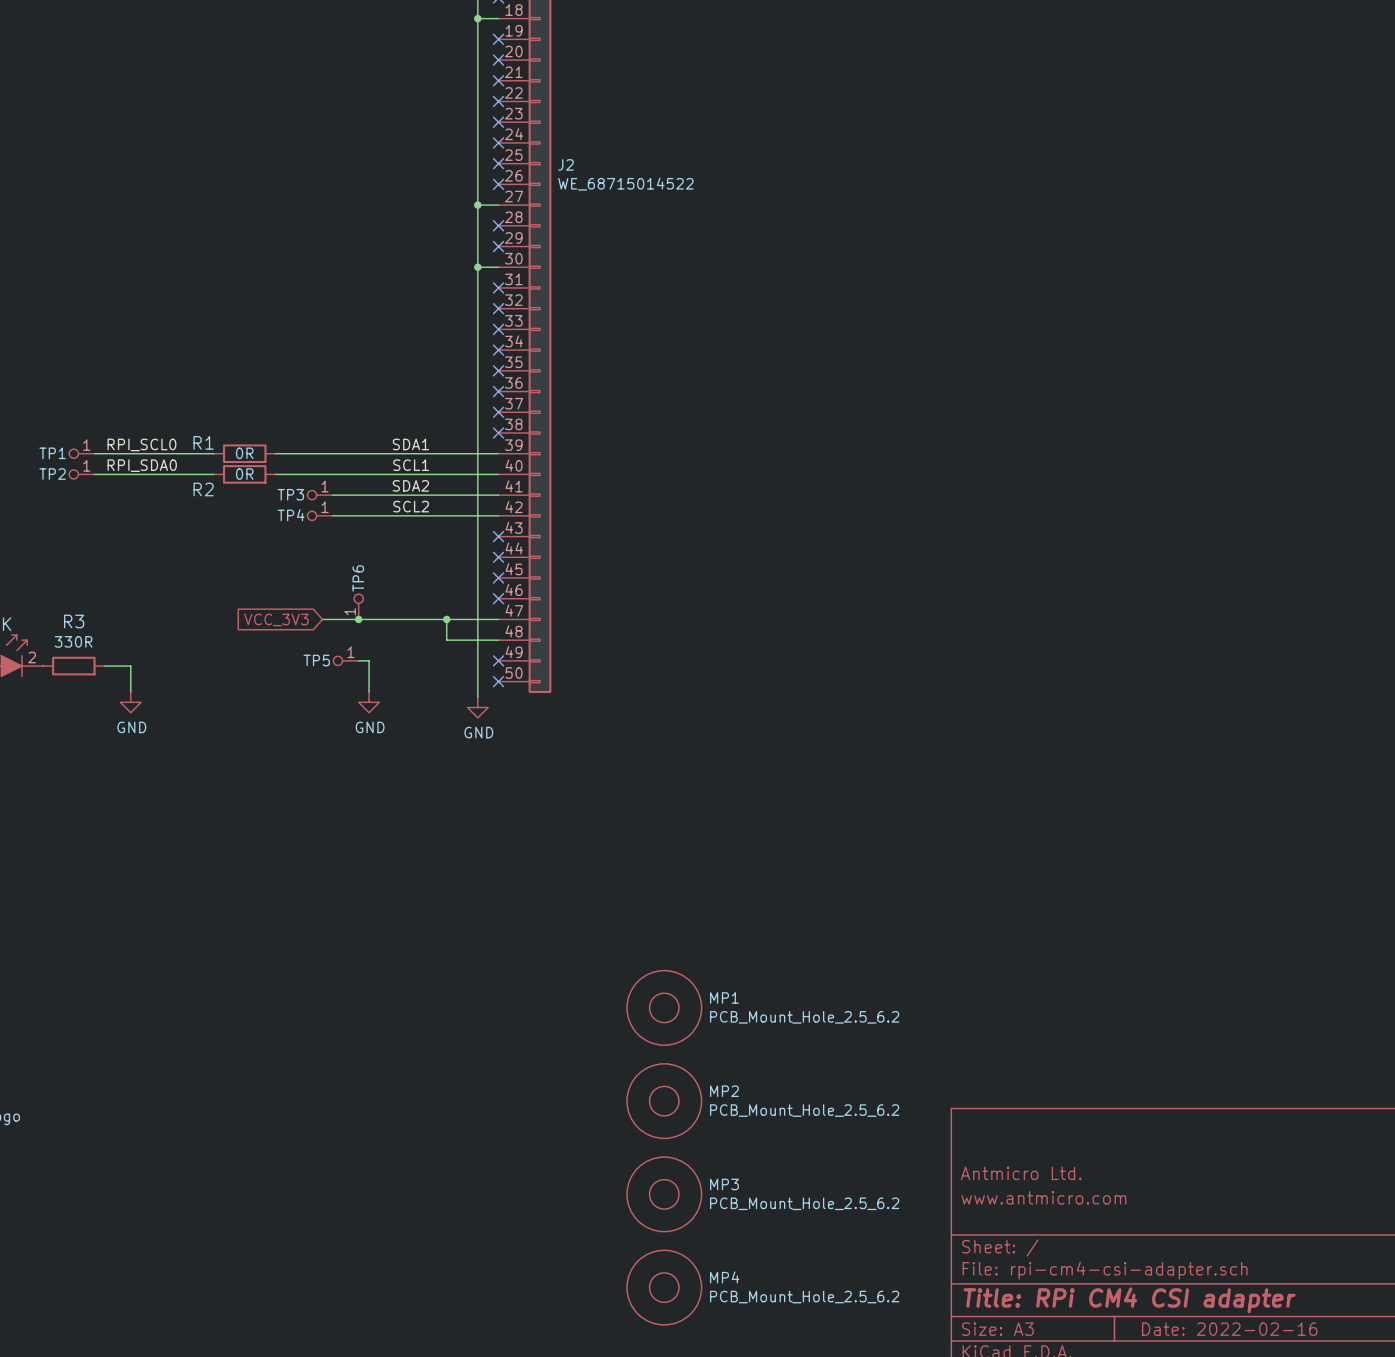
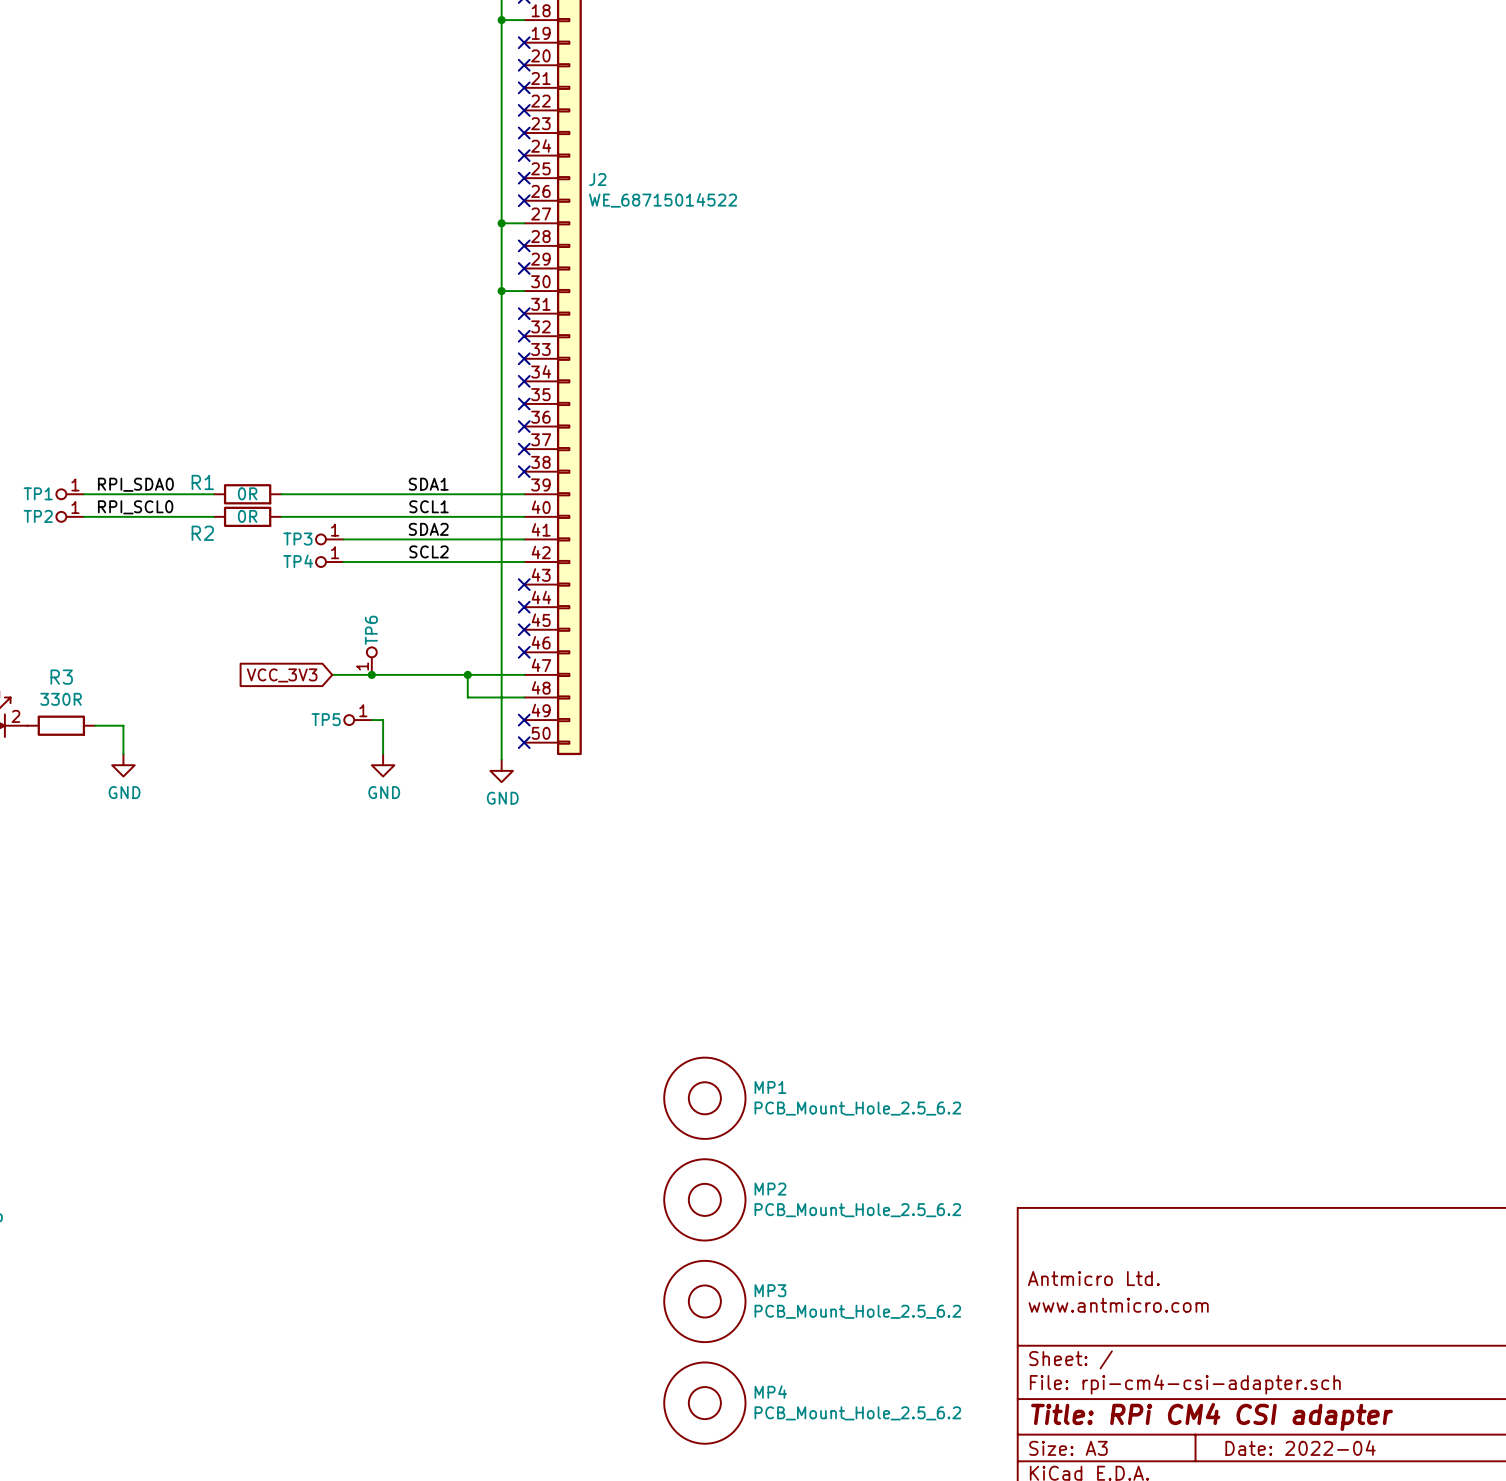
label: RPI_SCL0 (141, 444) -> RPI_SDA0 (135, 484)
label: RPI_SDA0 (142, 465) -> RPI_SCL0 (135, 507)
title block: Date: 2022-02-16 (1229, 1329) -> Date: 2022-04 (1300, 1448)

